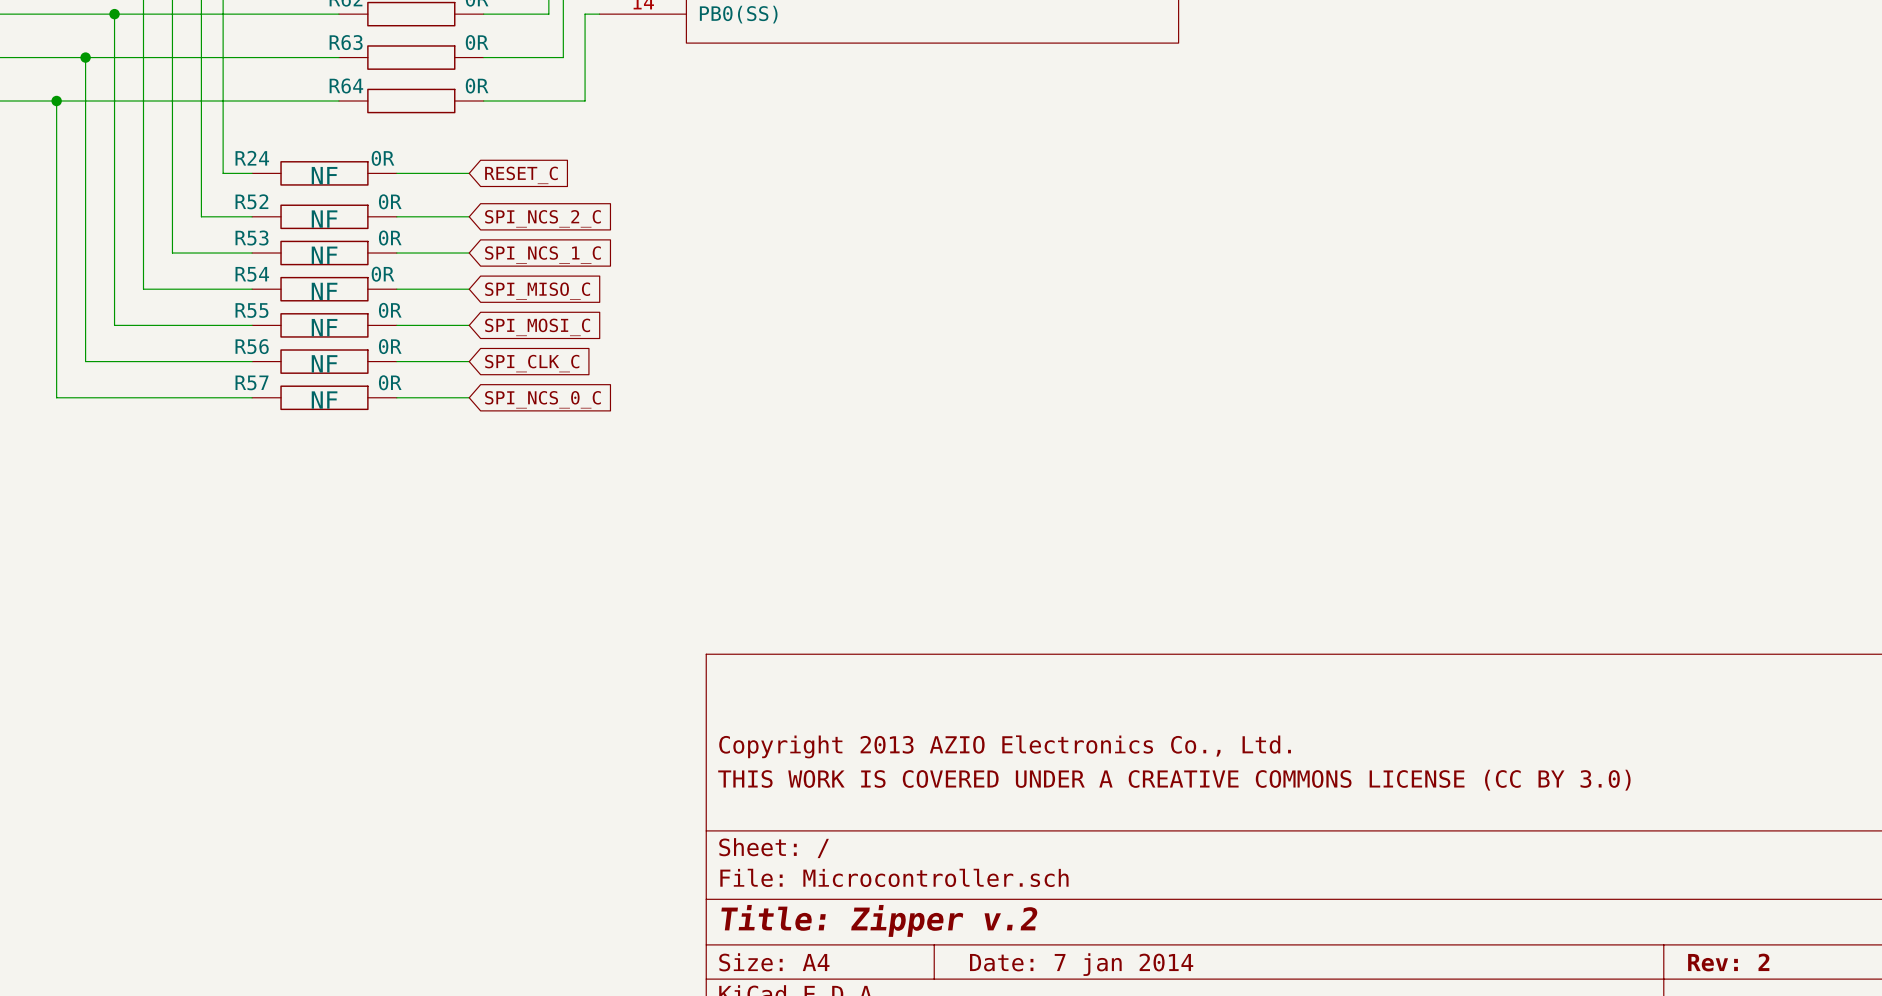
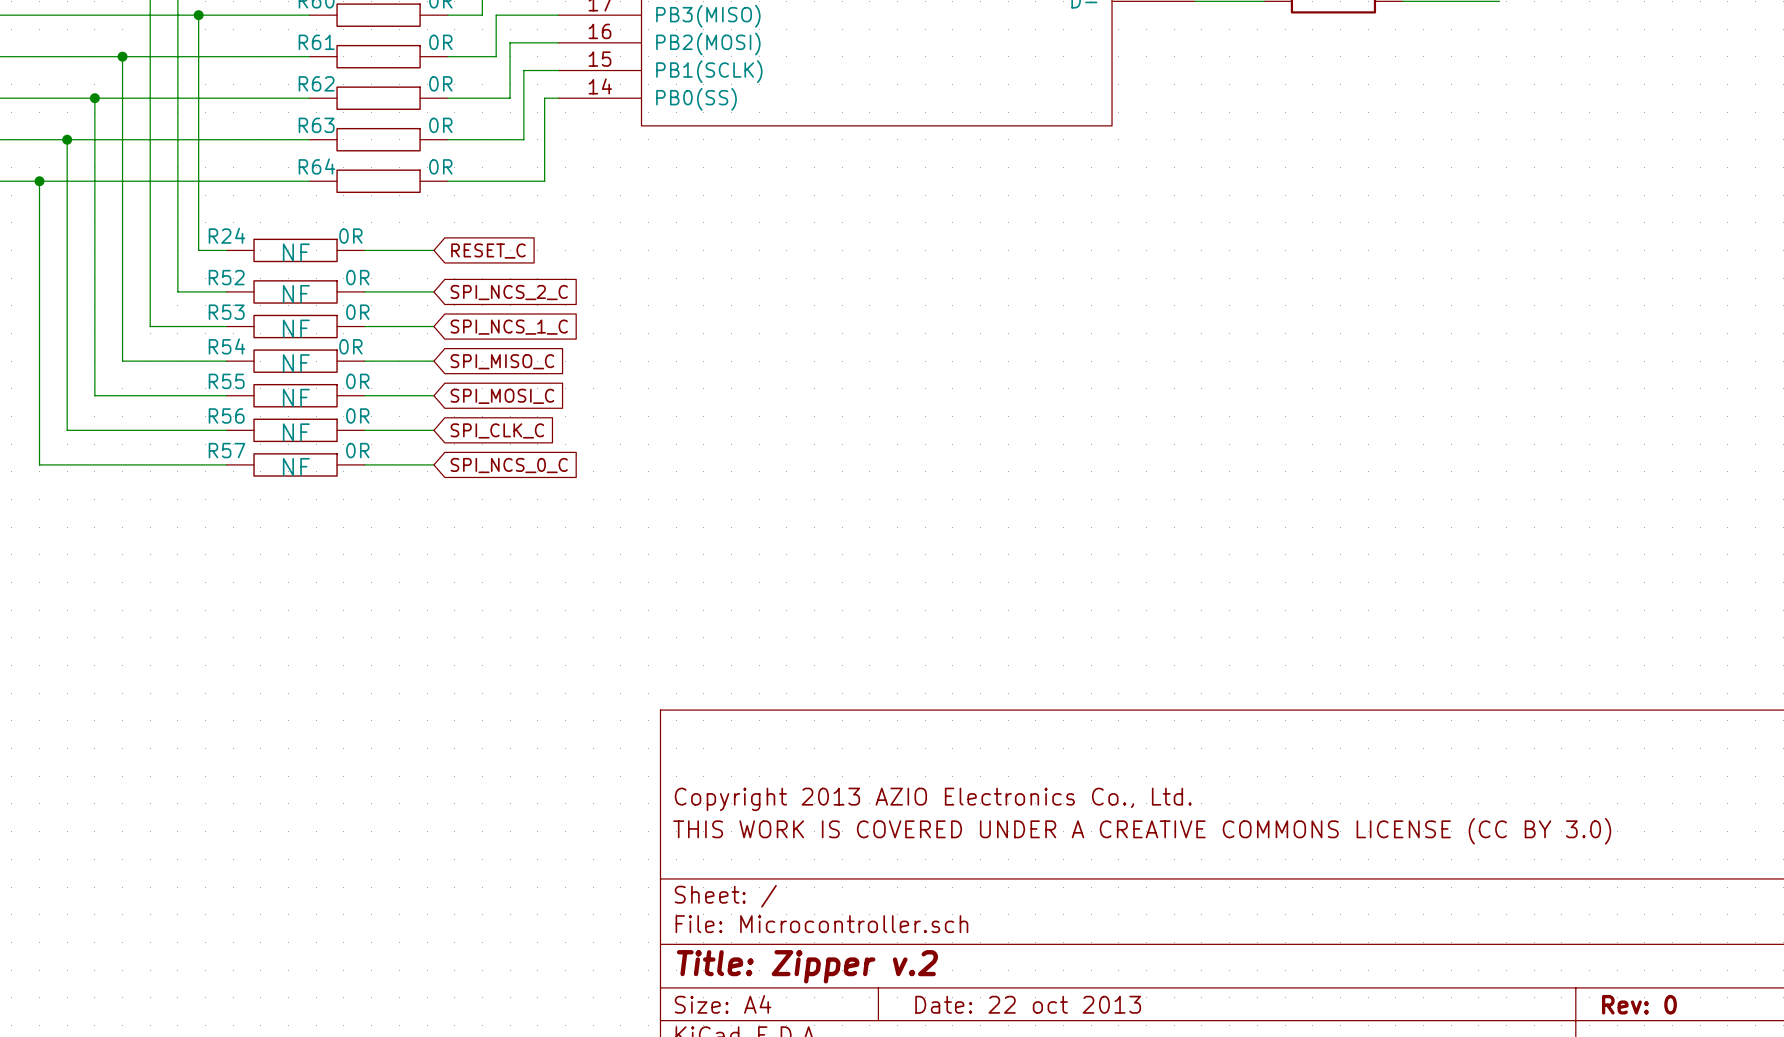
title block: Rev: 2 (1728, 962) -> Rev: 0 (1639, 1004)
title block: Date: 7 jan 2014 (1081, 964) -> Date: 22 oct 2013 (1028, 1004)

